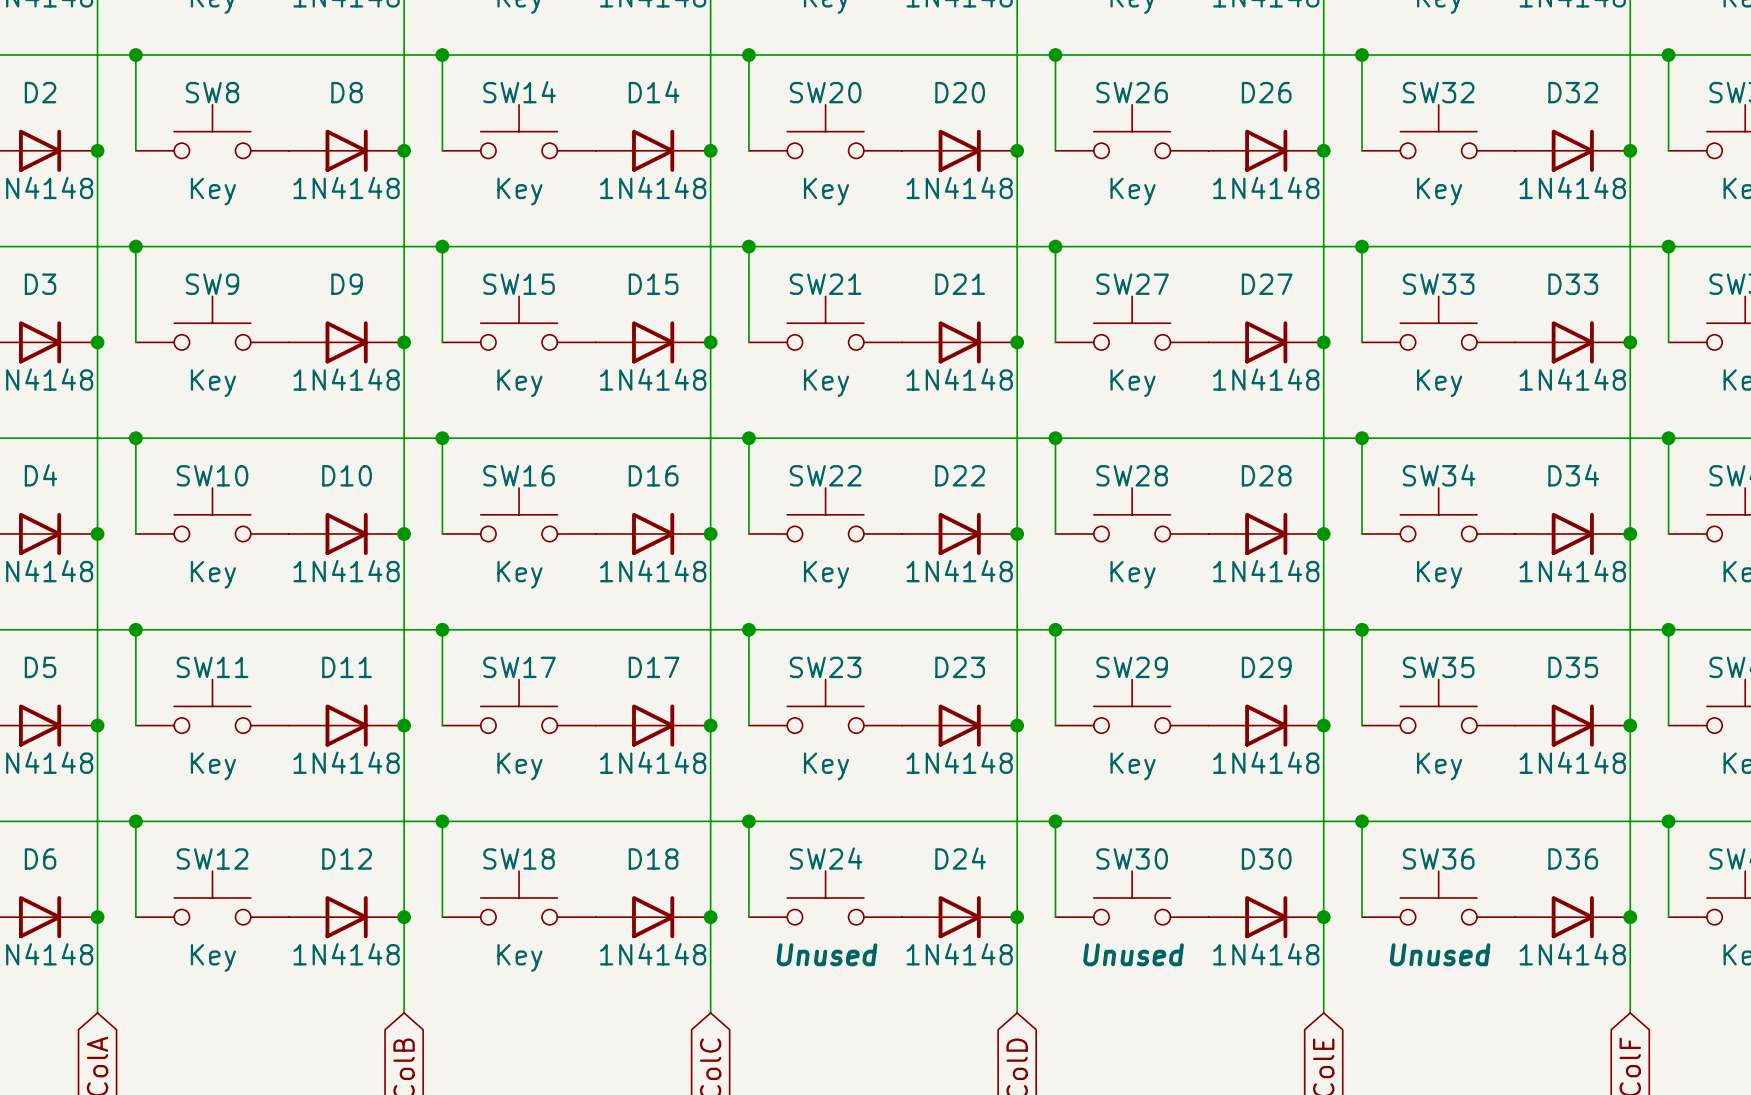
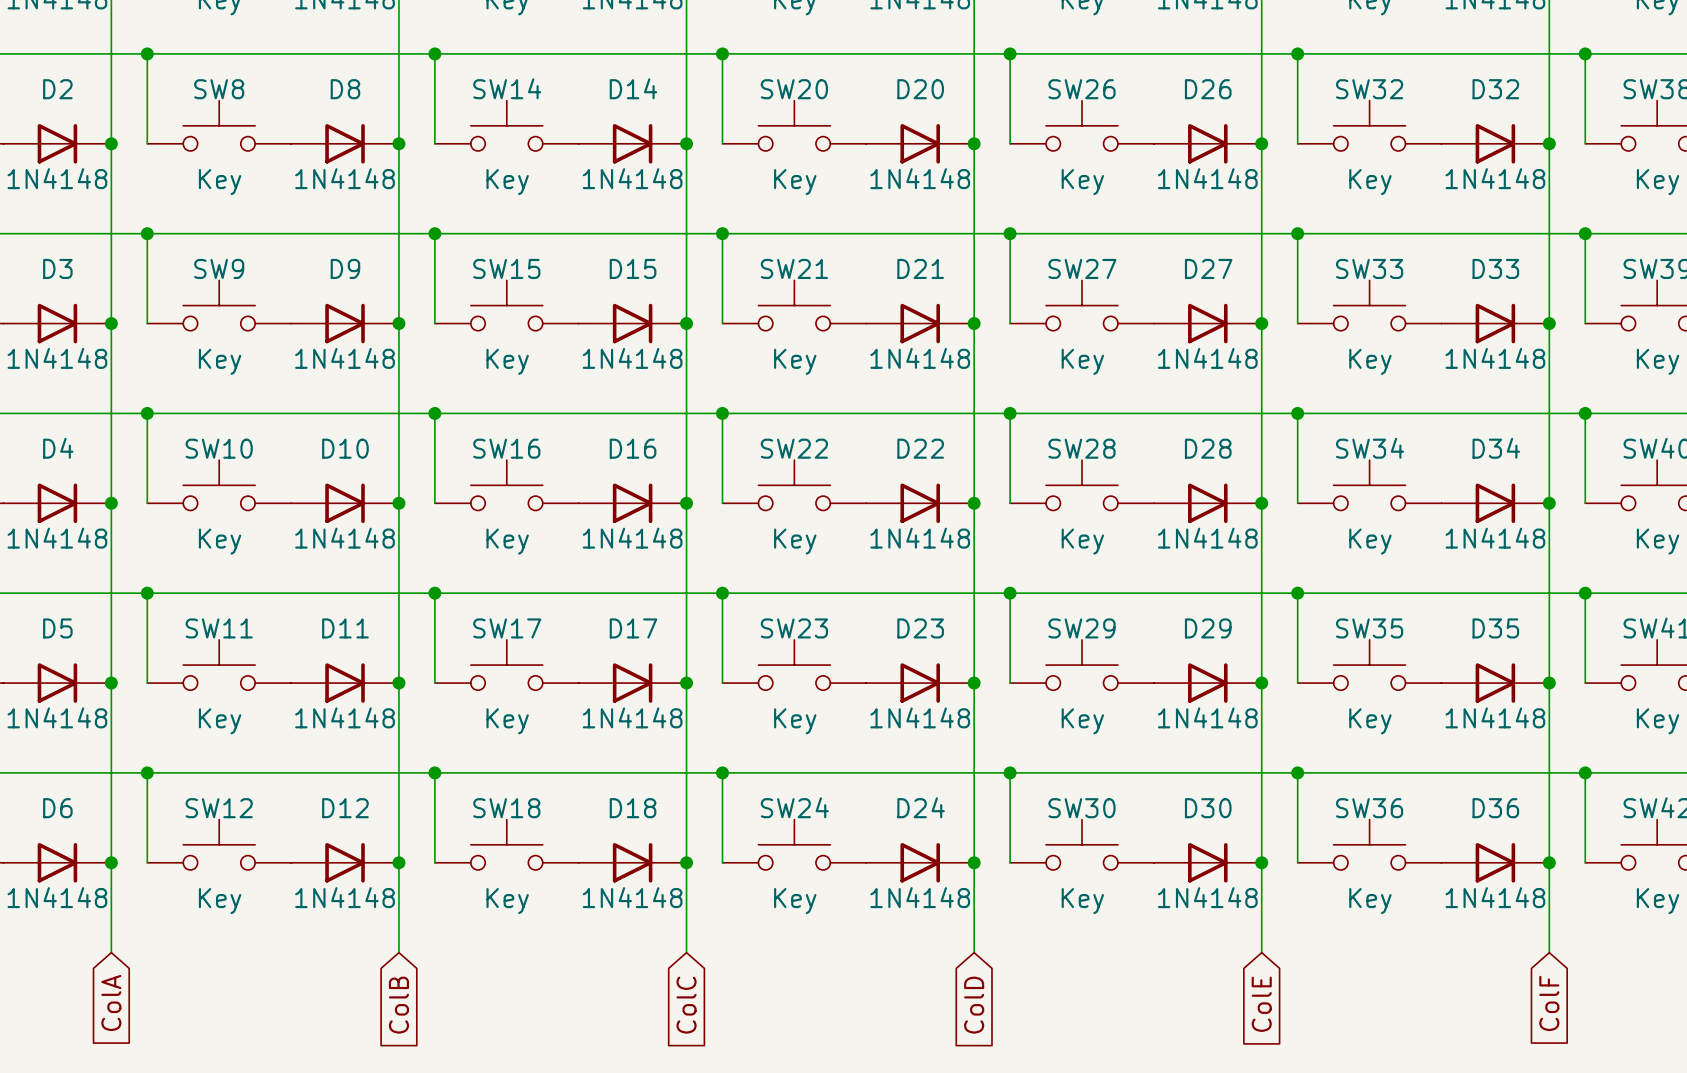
SW24 value: Unused (827, 954) -> Key (795, 901)
SW30 value: Unused (1133, 954) -> Key (1082, 901)
SW36 value: Unused (1440, 954) -> Key (1370, 901)

